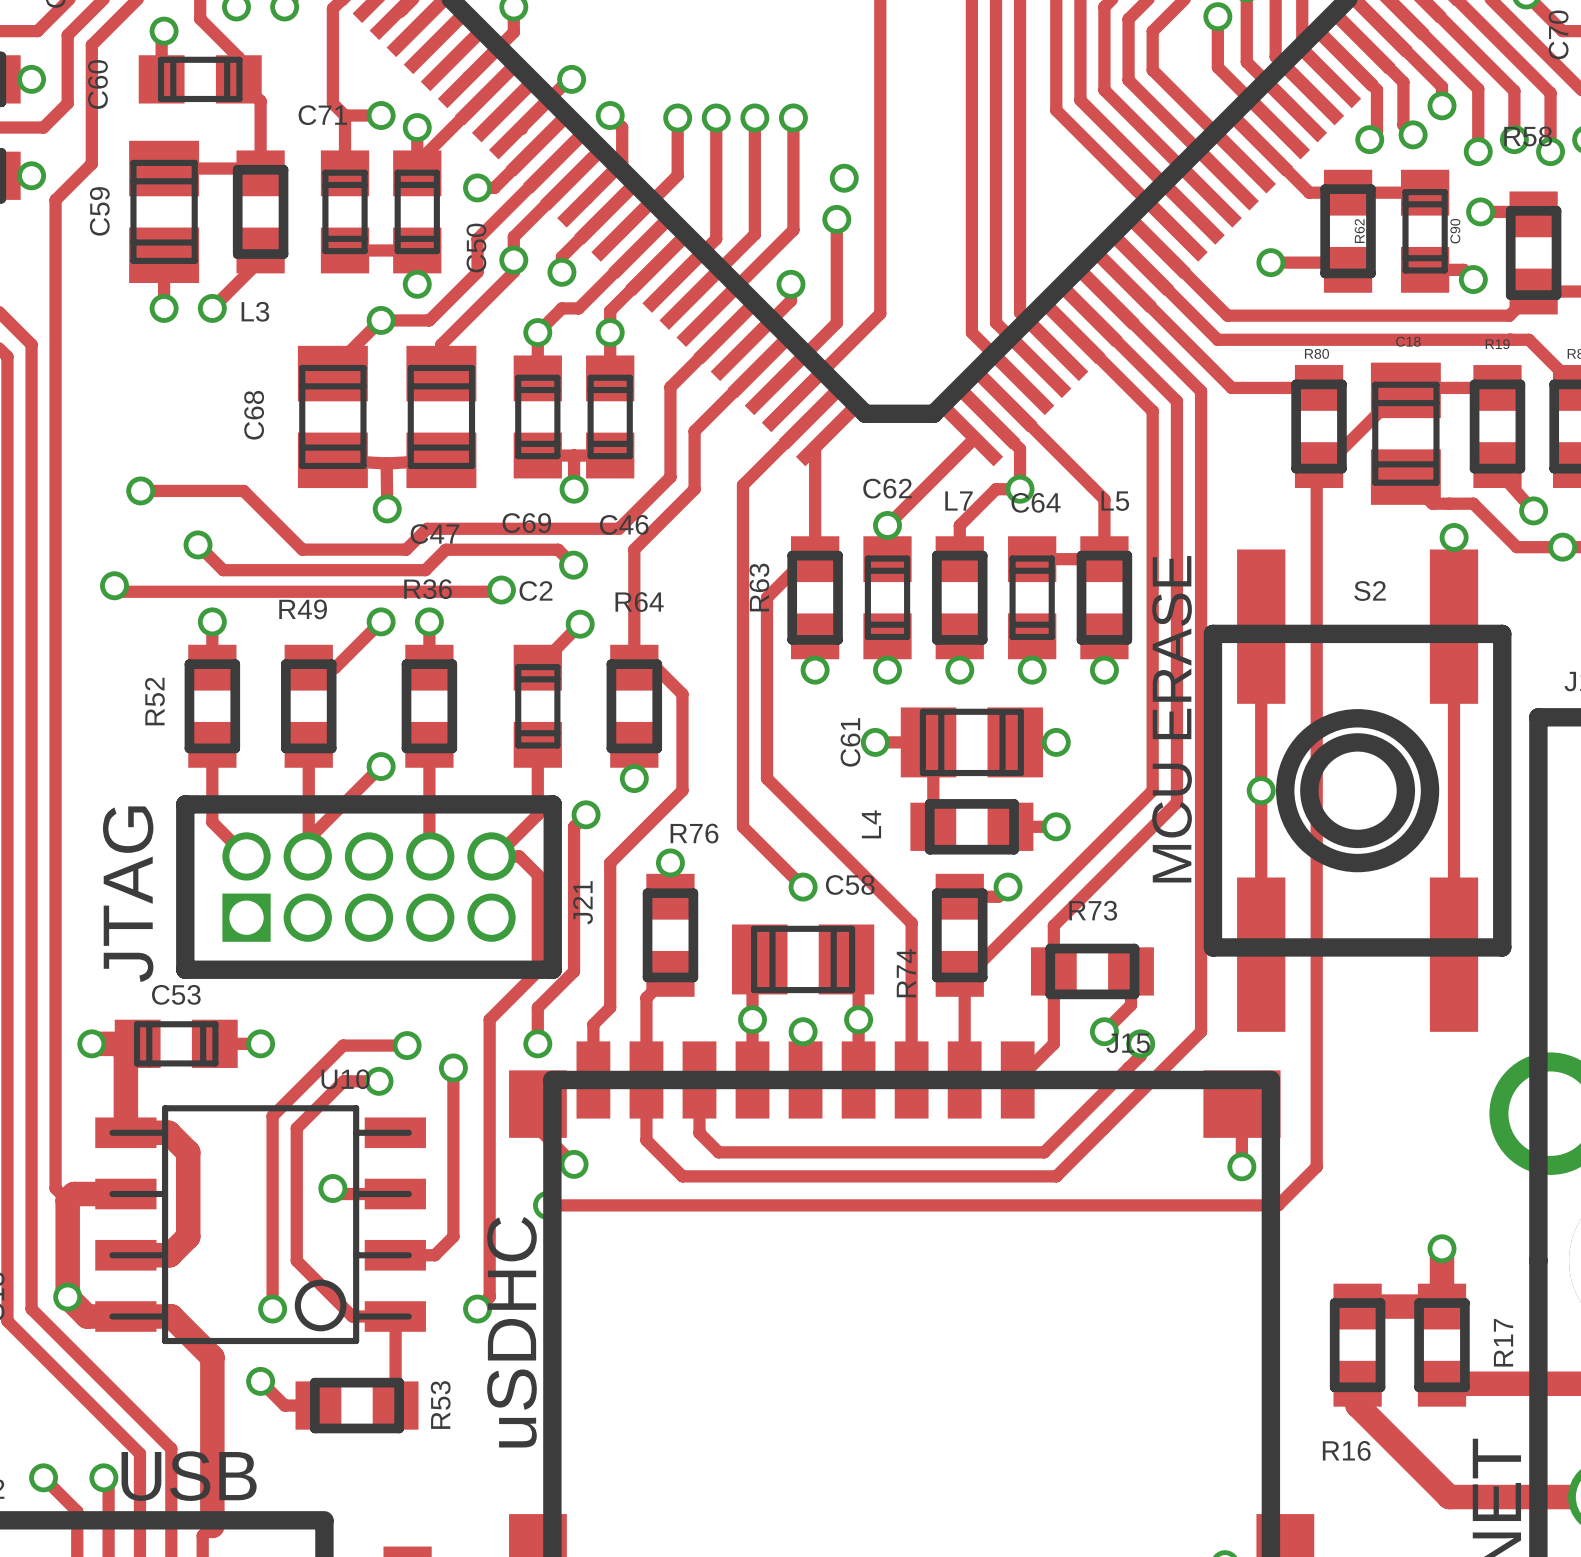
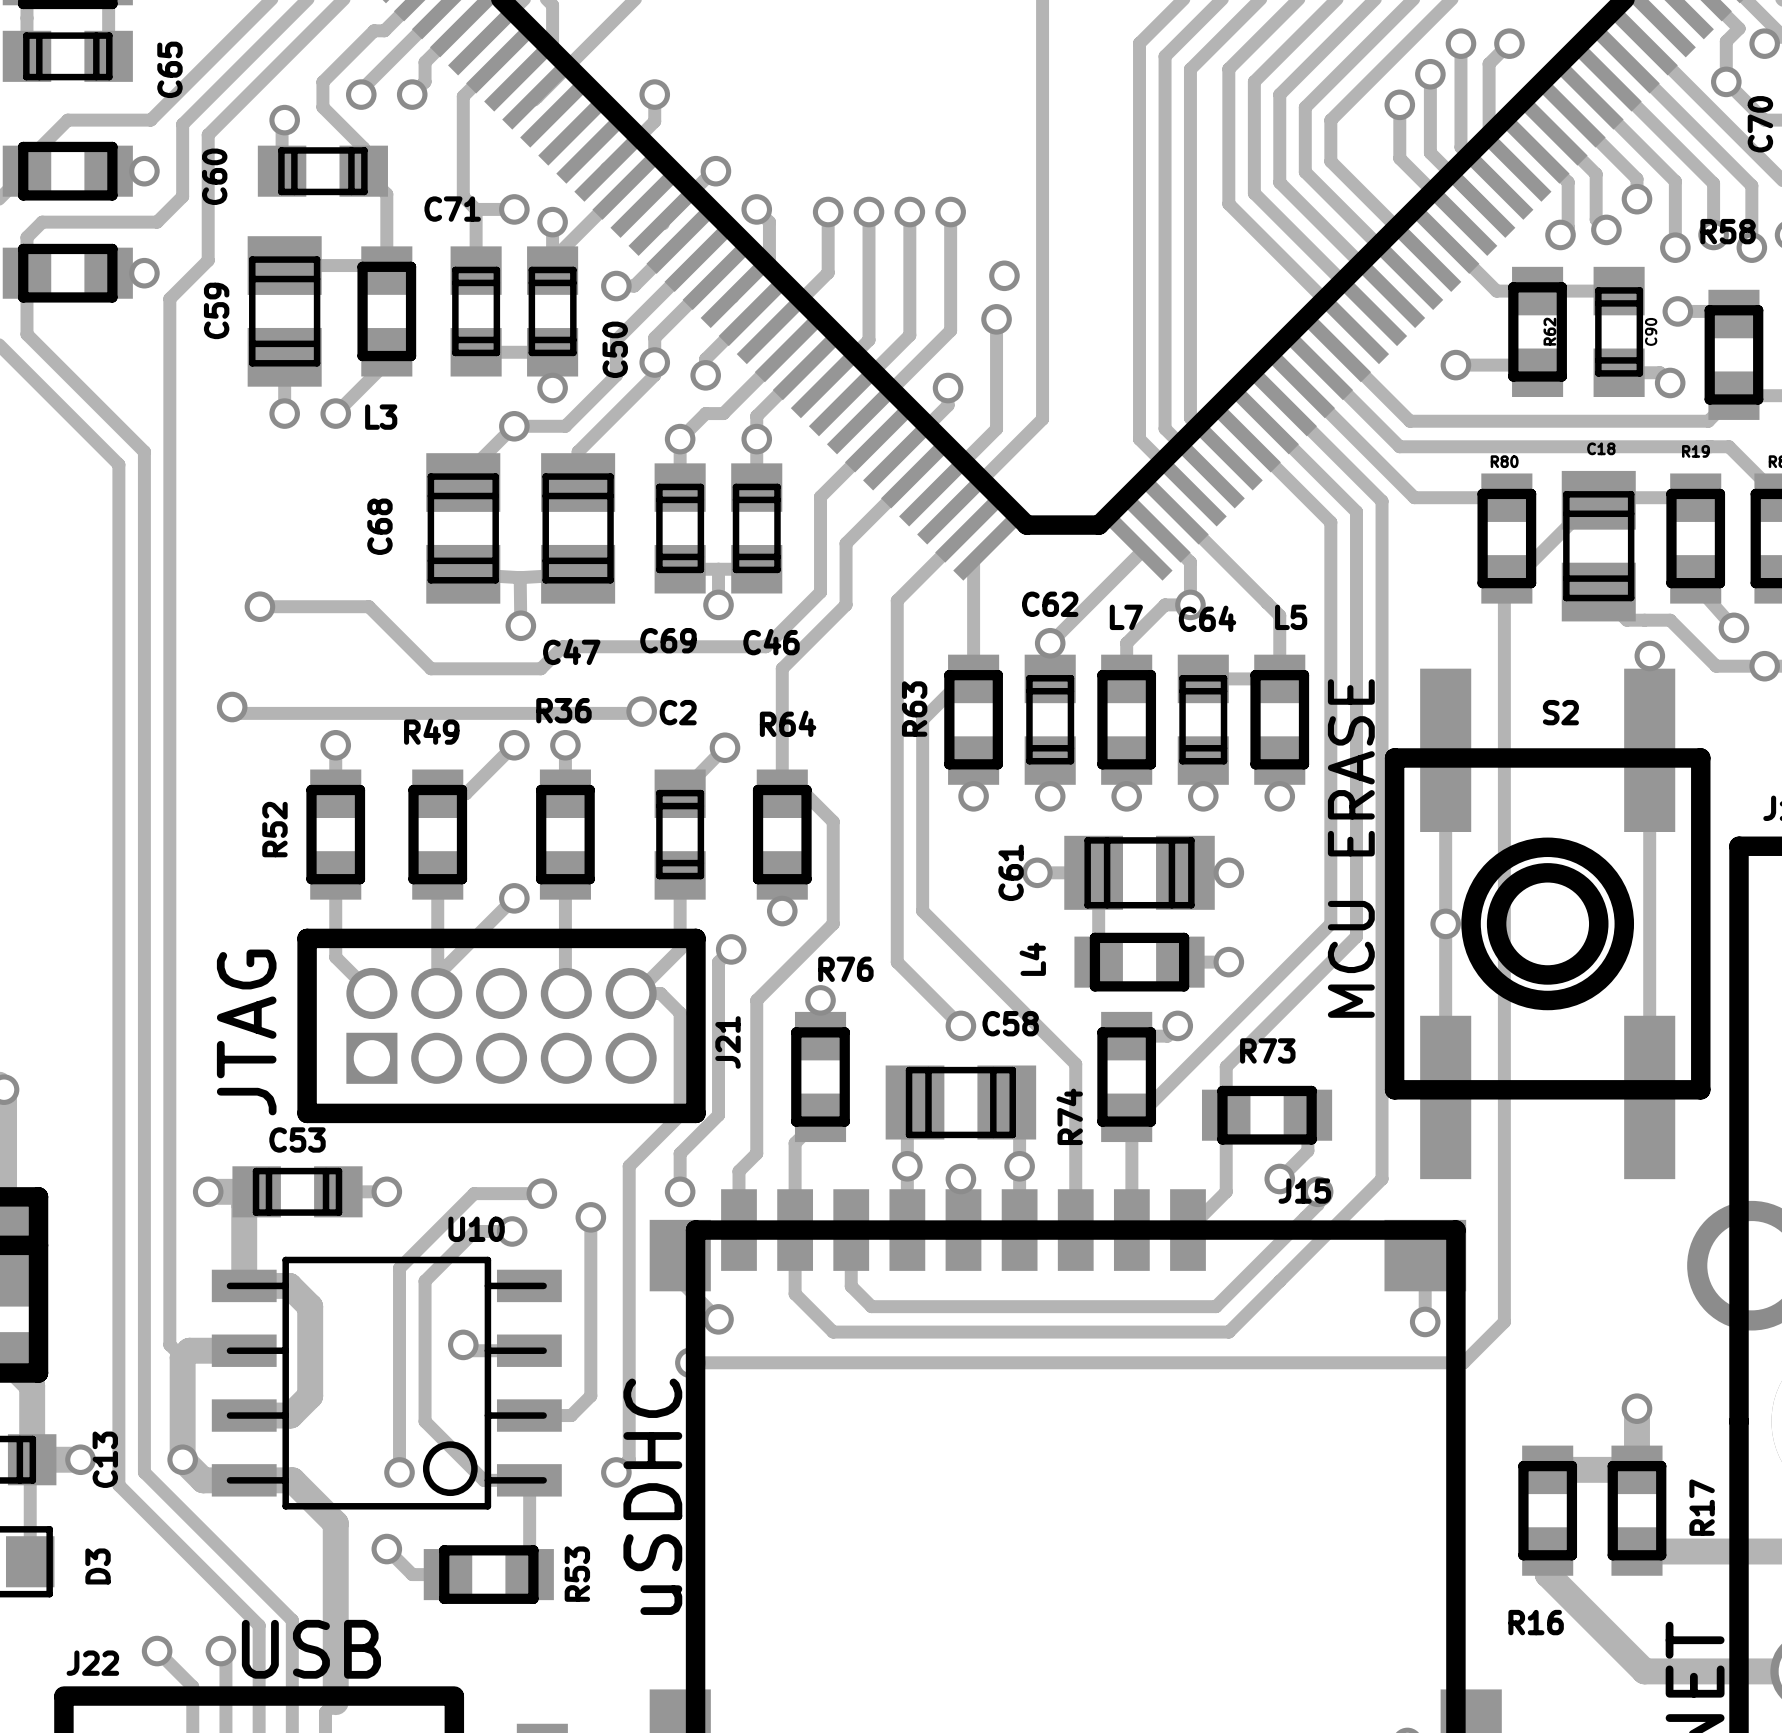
track: (198, 544) (223, 570) (425, 570) (445, 549) (558, 549) (573, 565) -> none
via: (198, 544) -> none
via: (573, 565) -> none

